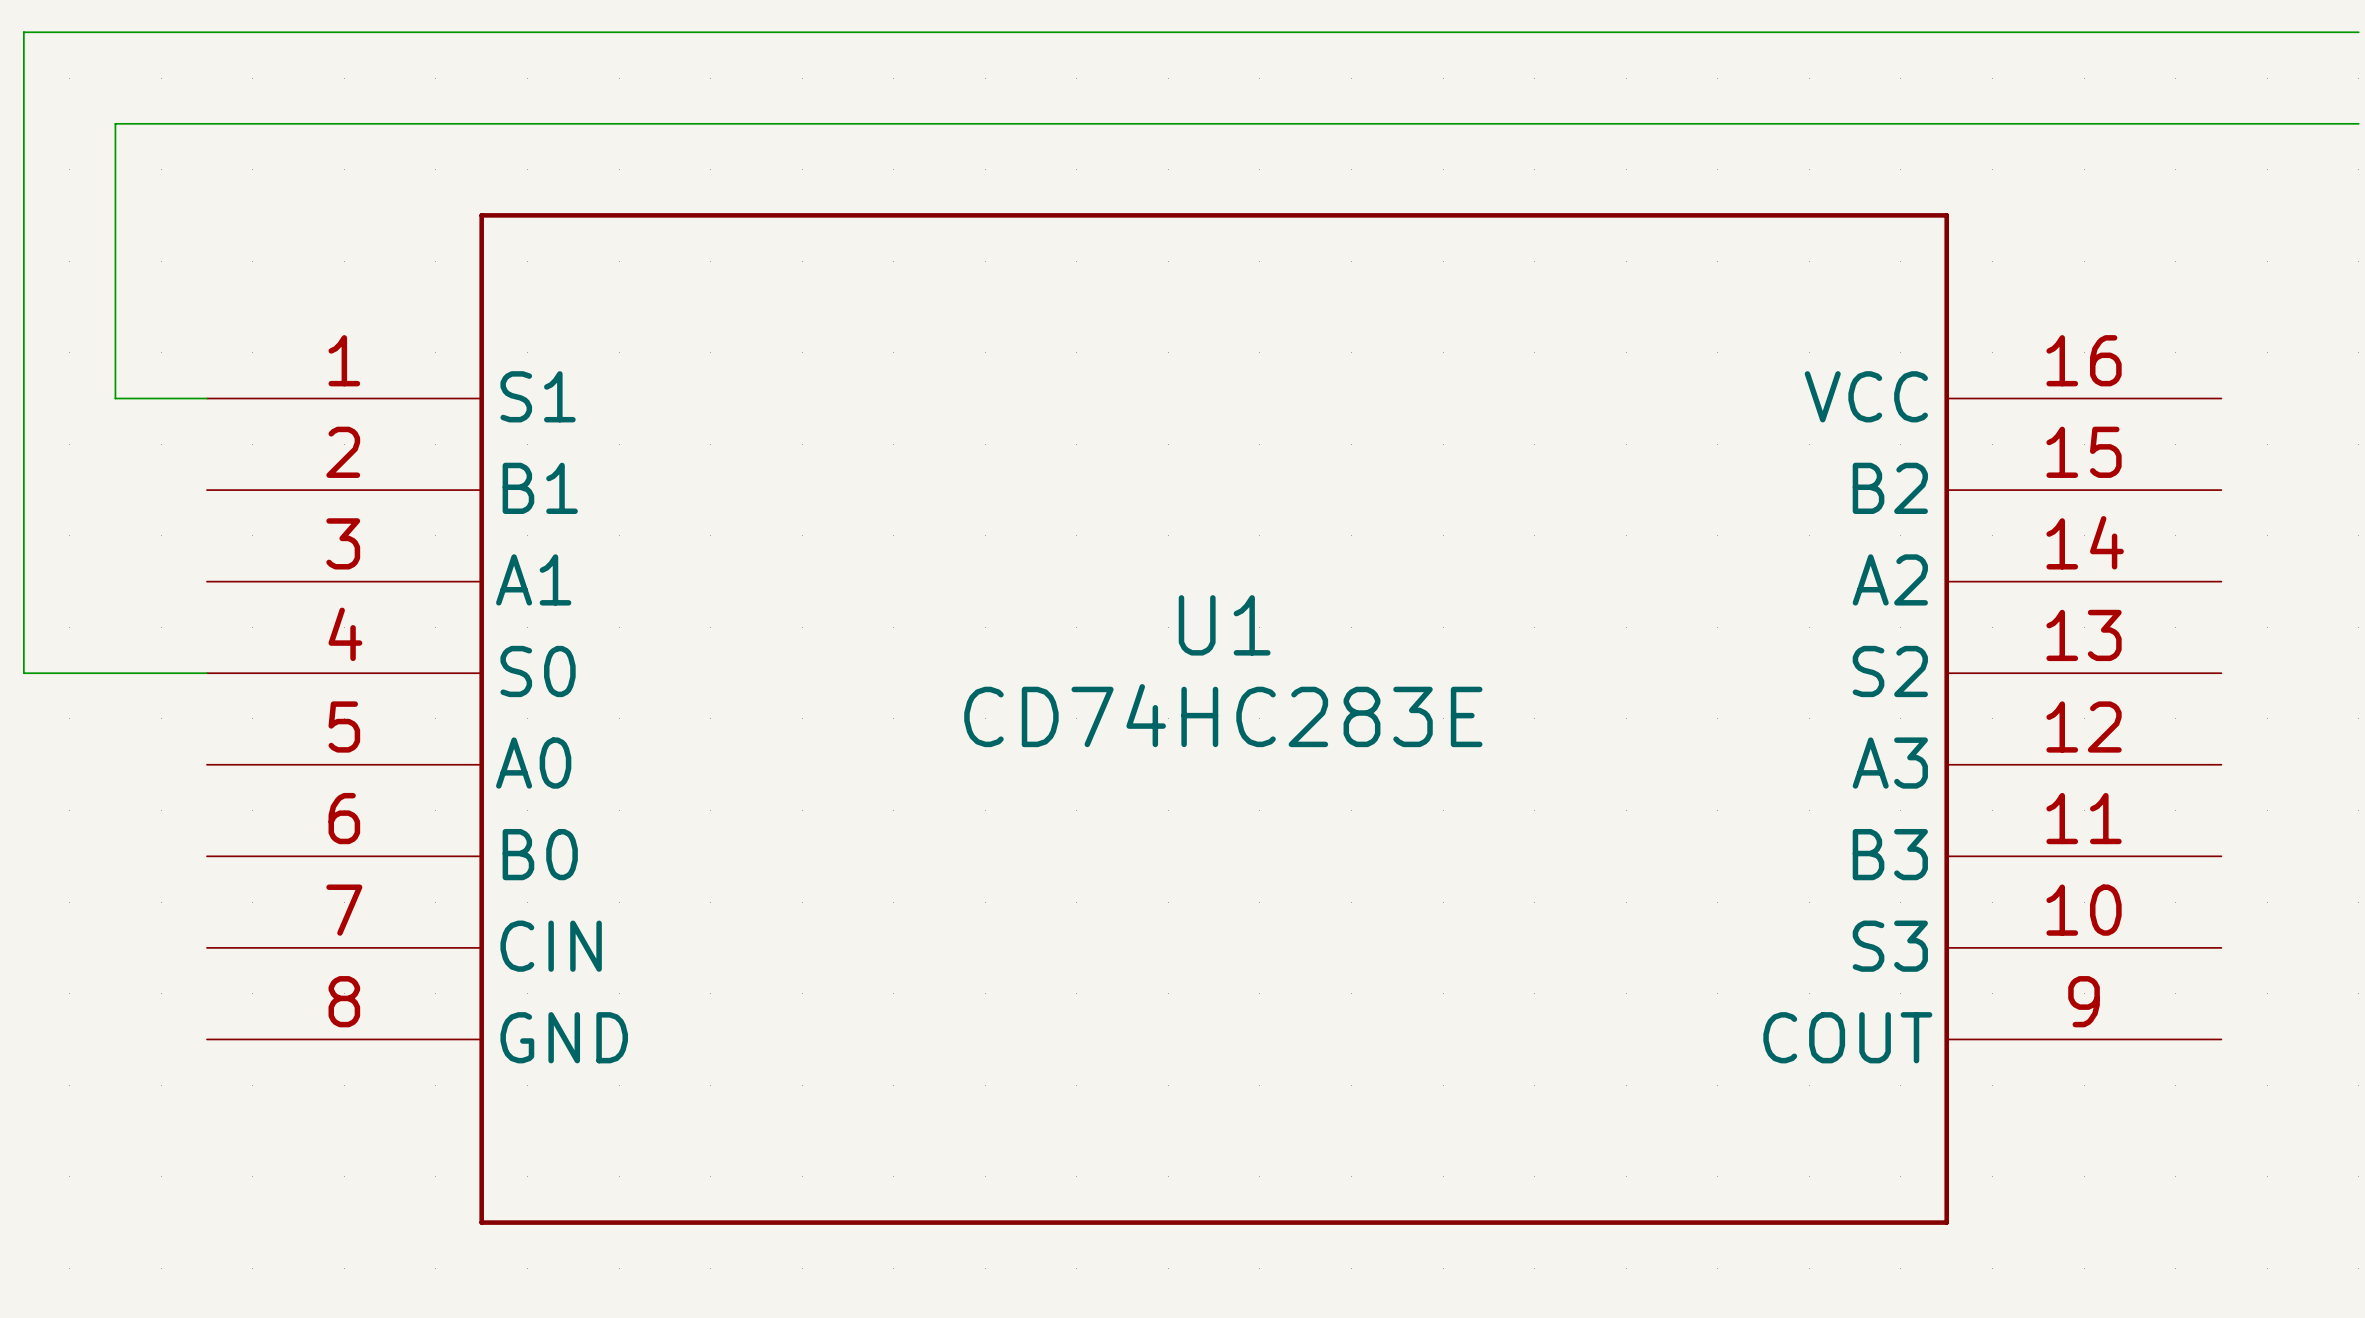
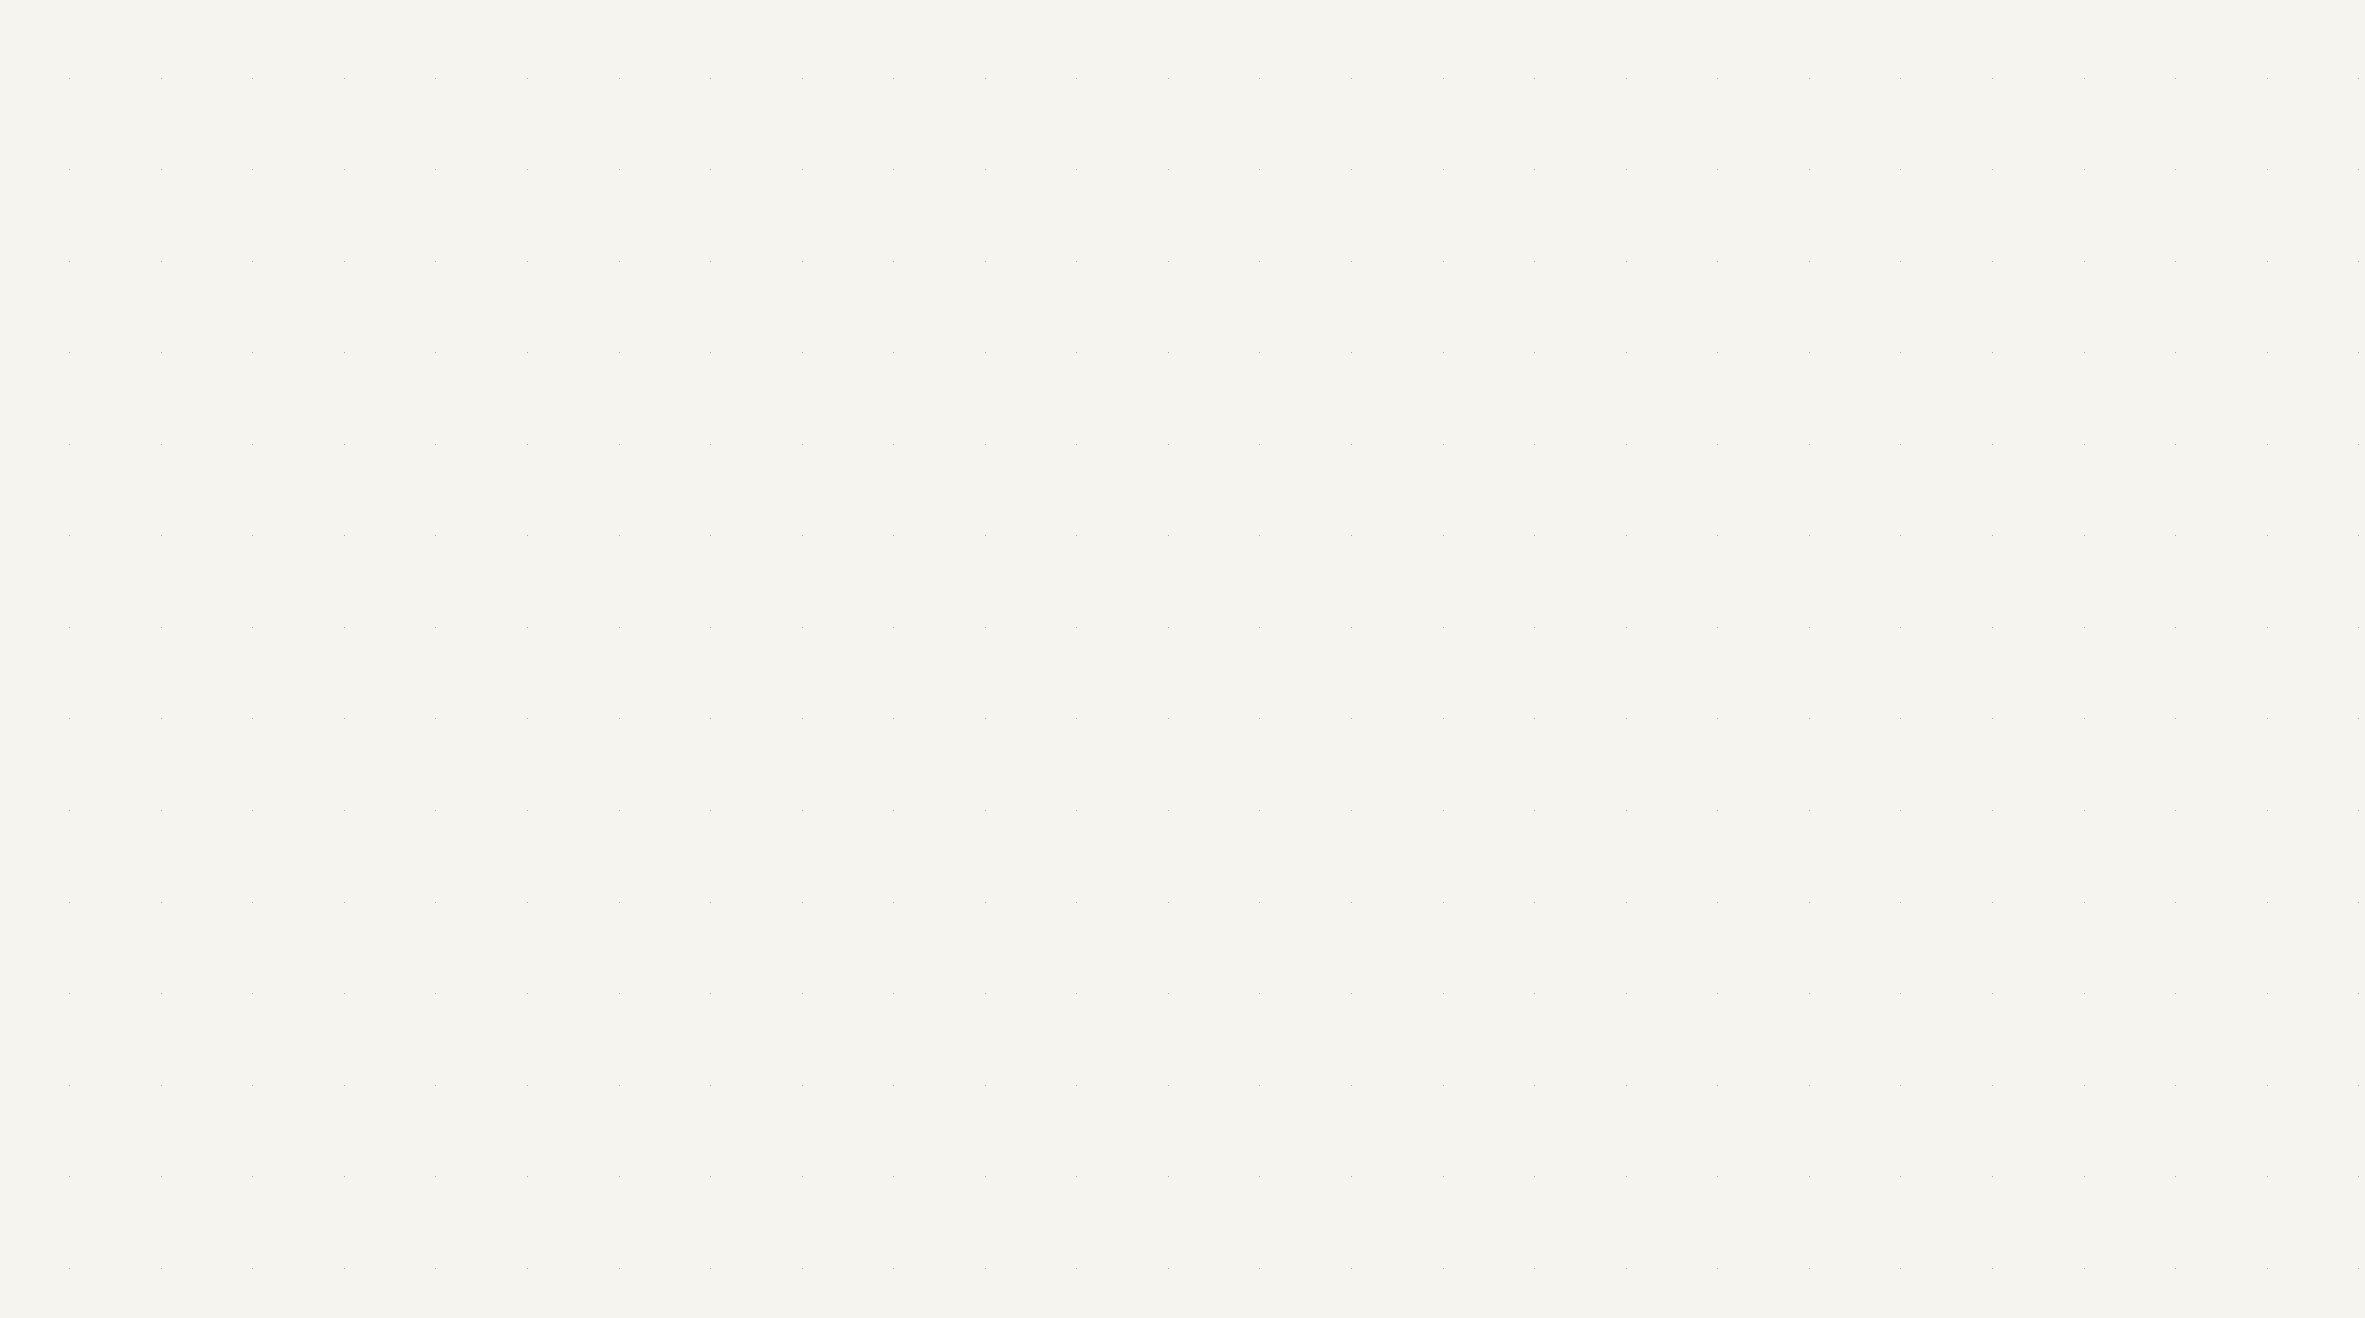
wire: (2358, 32) (23, 32) (23, 673) (206, 673) -> none
wire: (2358, 123) (115, 123) (115, 398) (206, 398) -> none
U1: CD74HC283E (1214, 718) -> none

